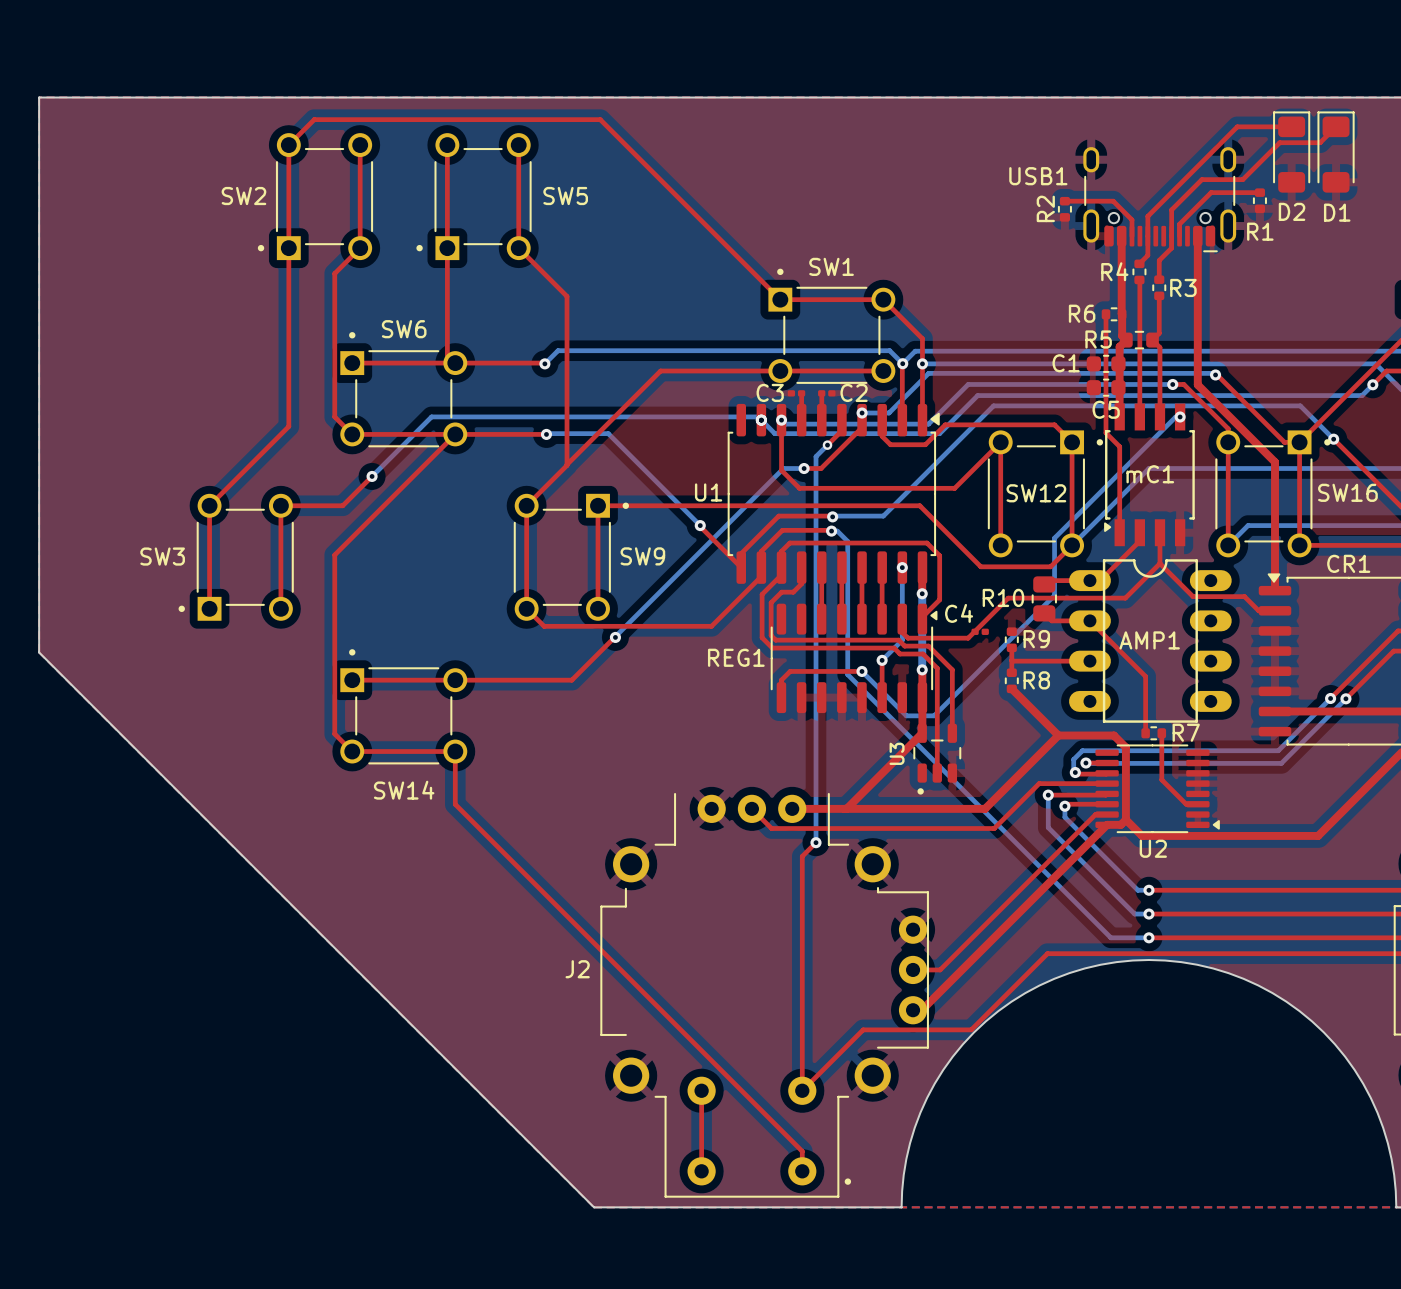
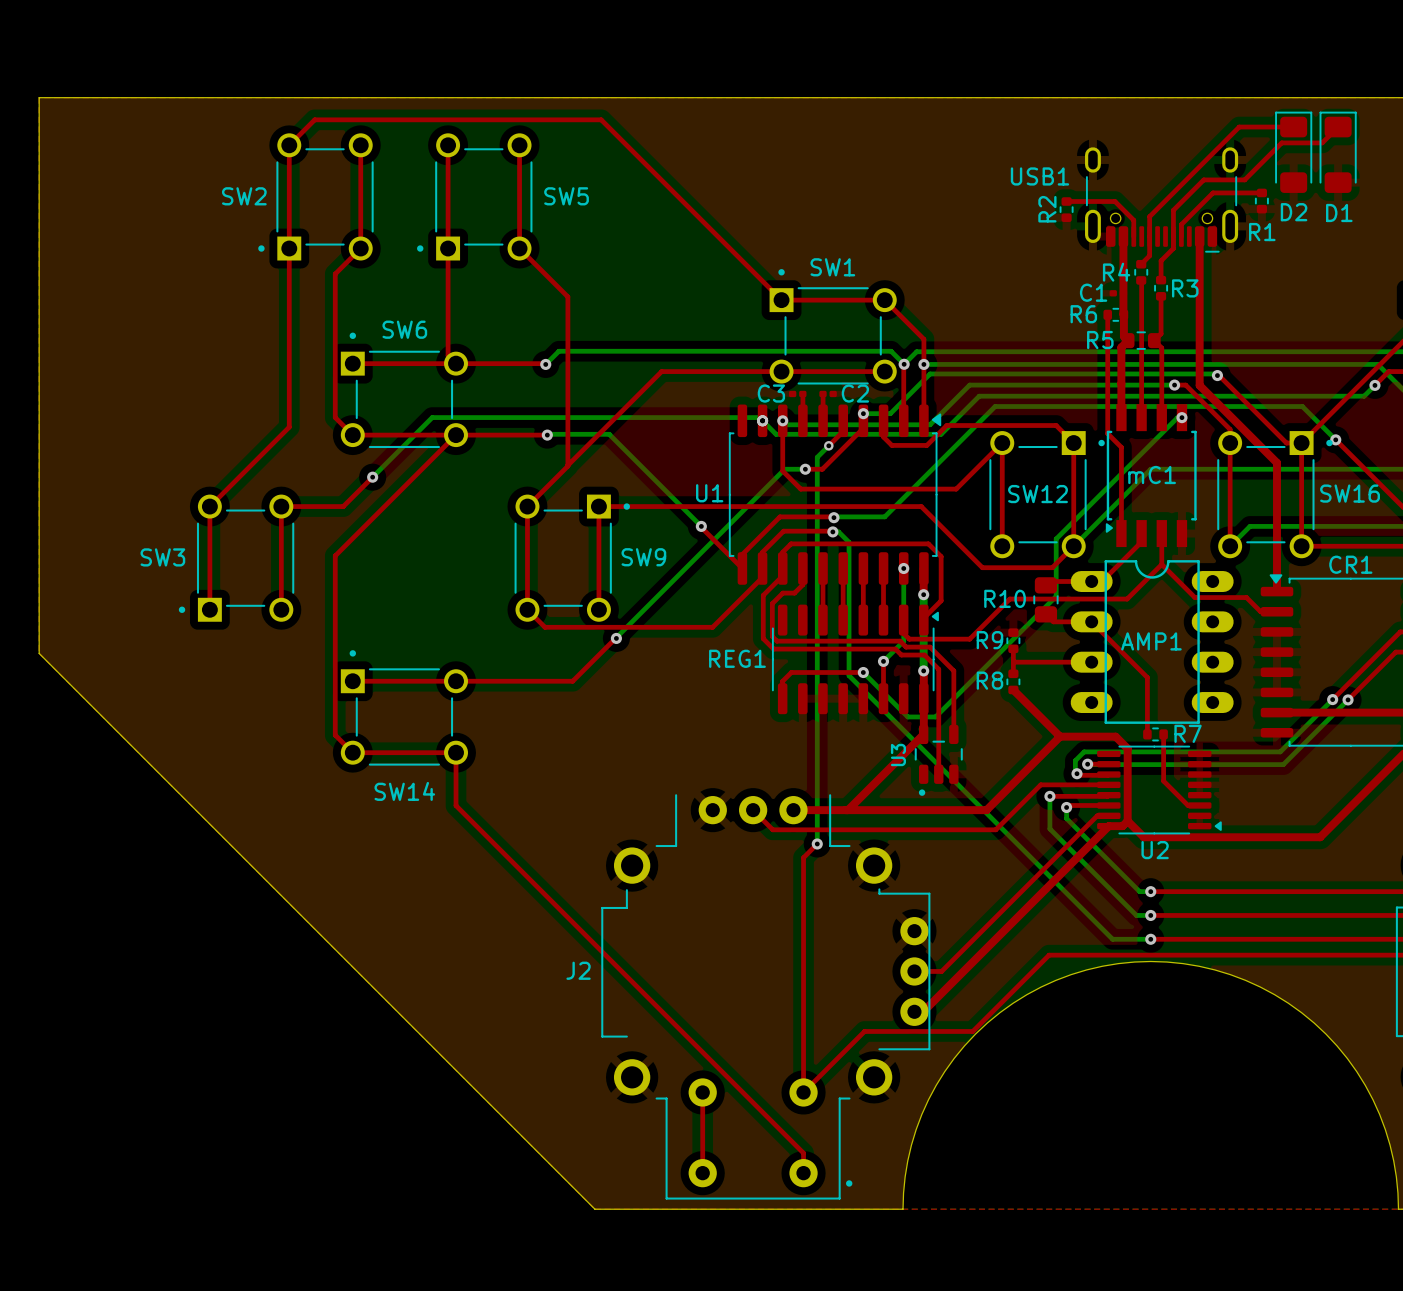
C1 footprint: [1086, 354, 1126, 373] -> [1109, 290, 1128, 297]
C5: (1106, 387) -> none
C4: (980, 631) -> none
R9 name position: R9 (1036, 639) -> R9 (989, 640)
R8 name position: R8 (1036, 680) -> R8 (989, 680)

